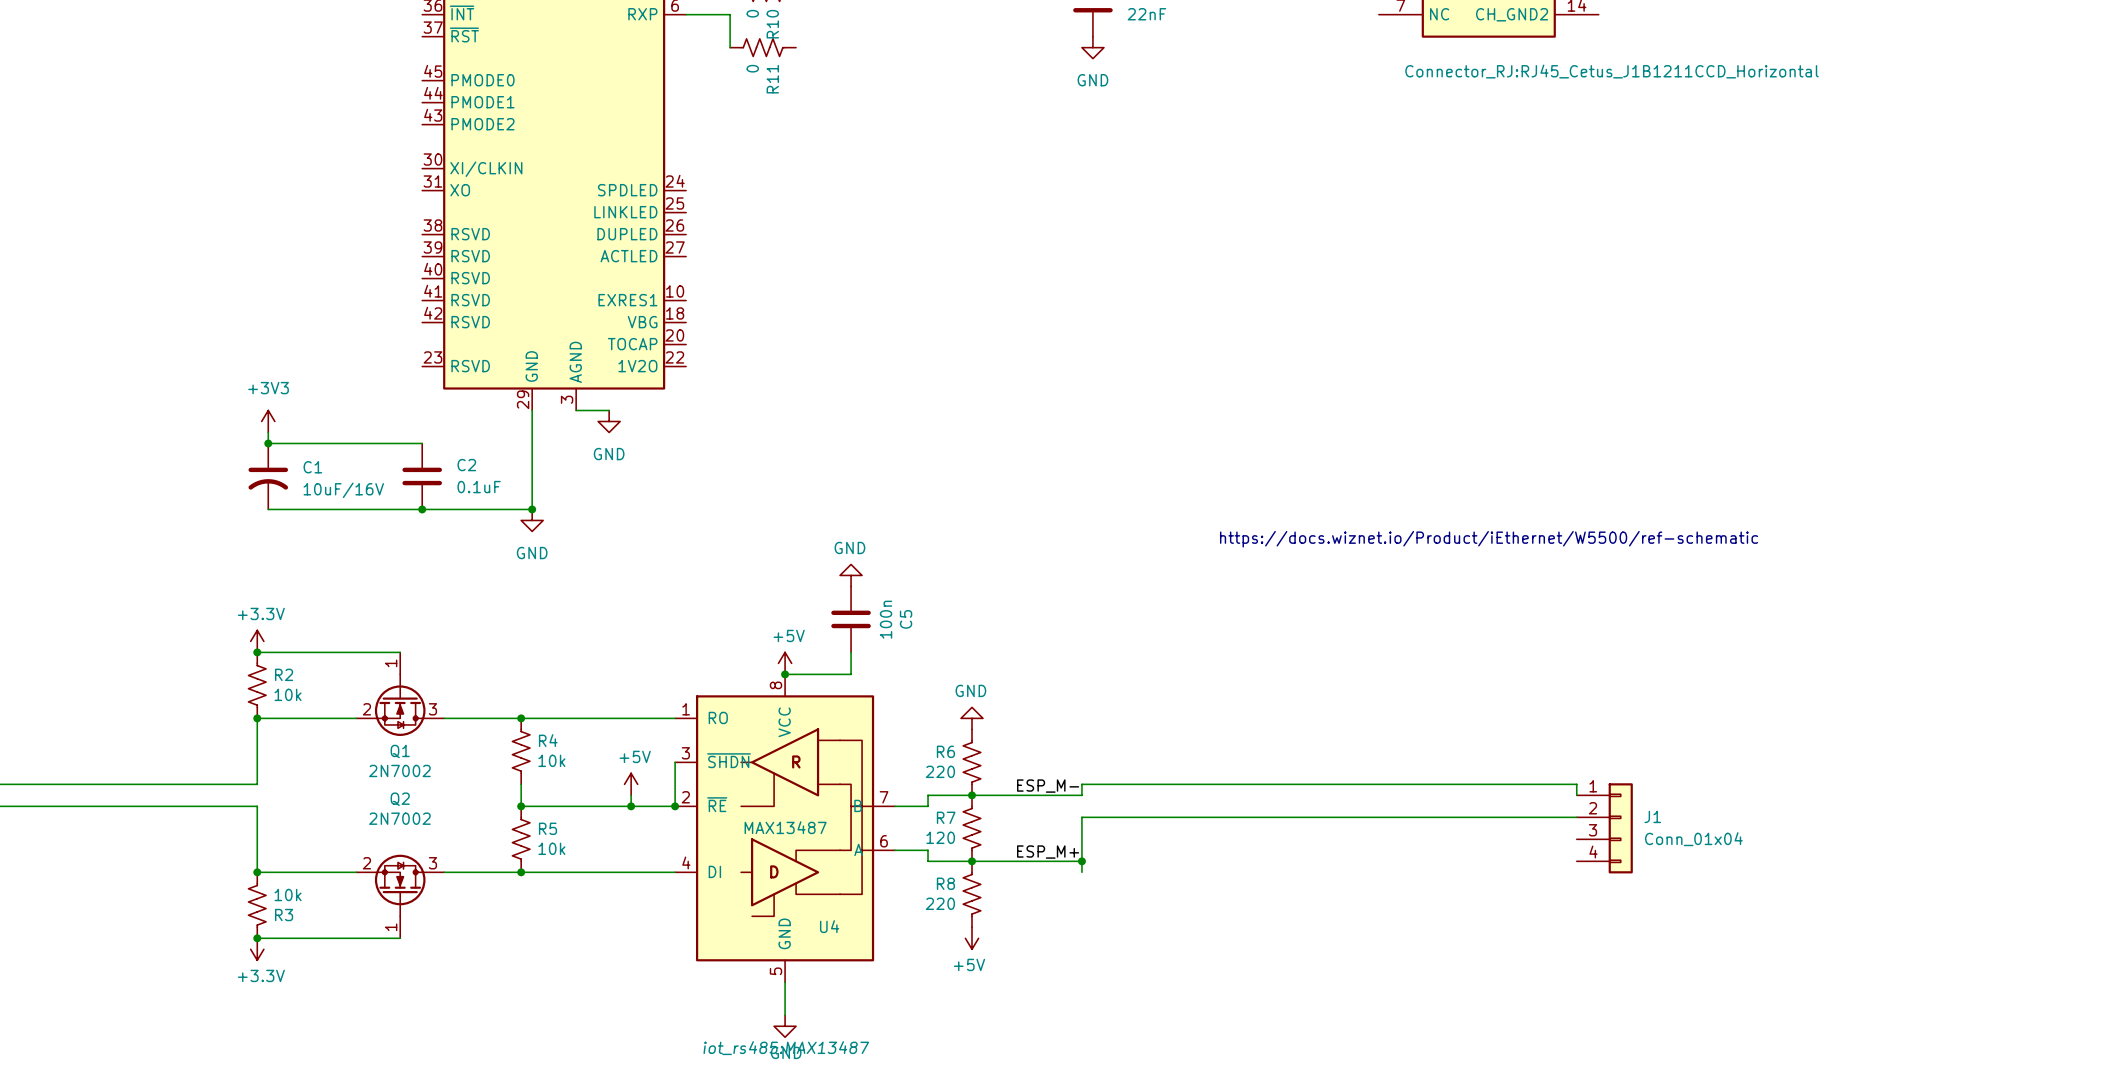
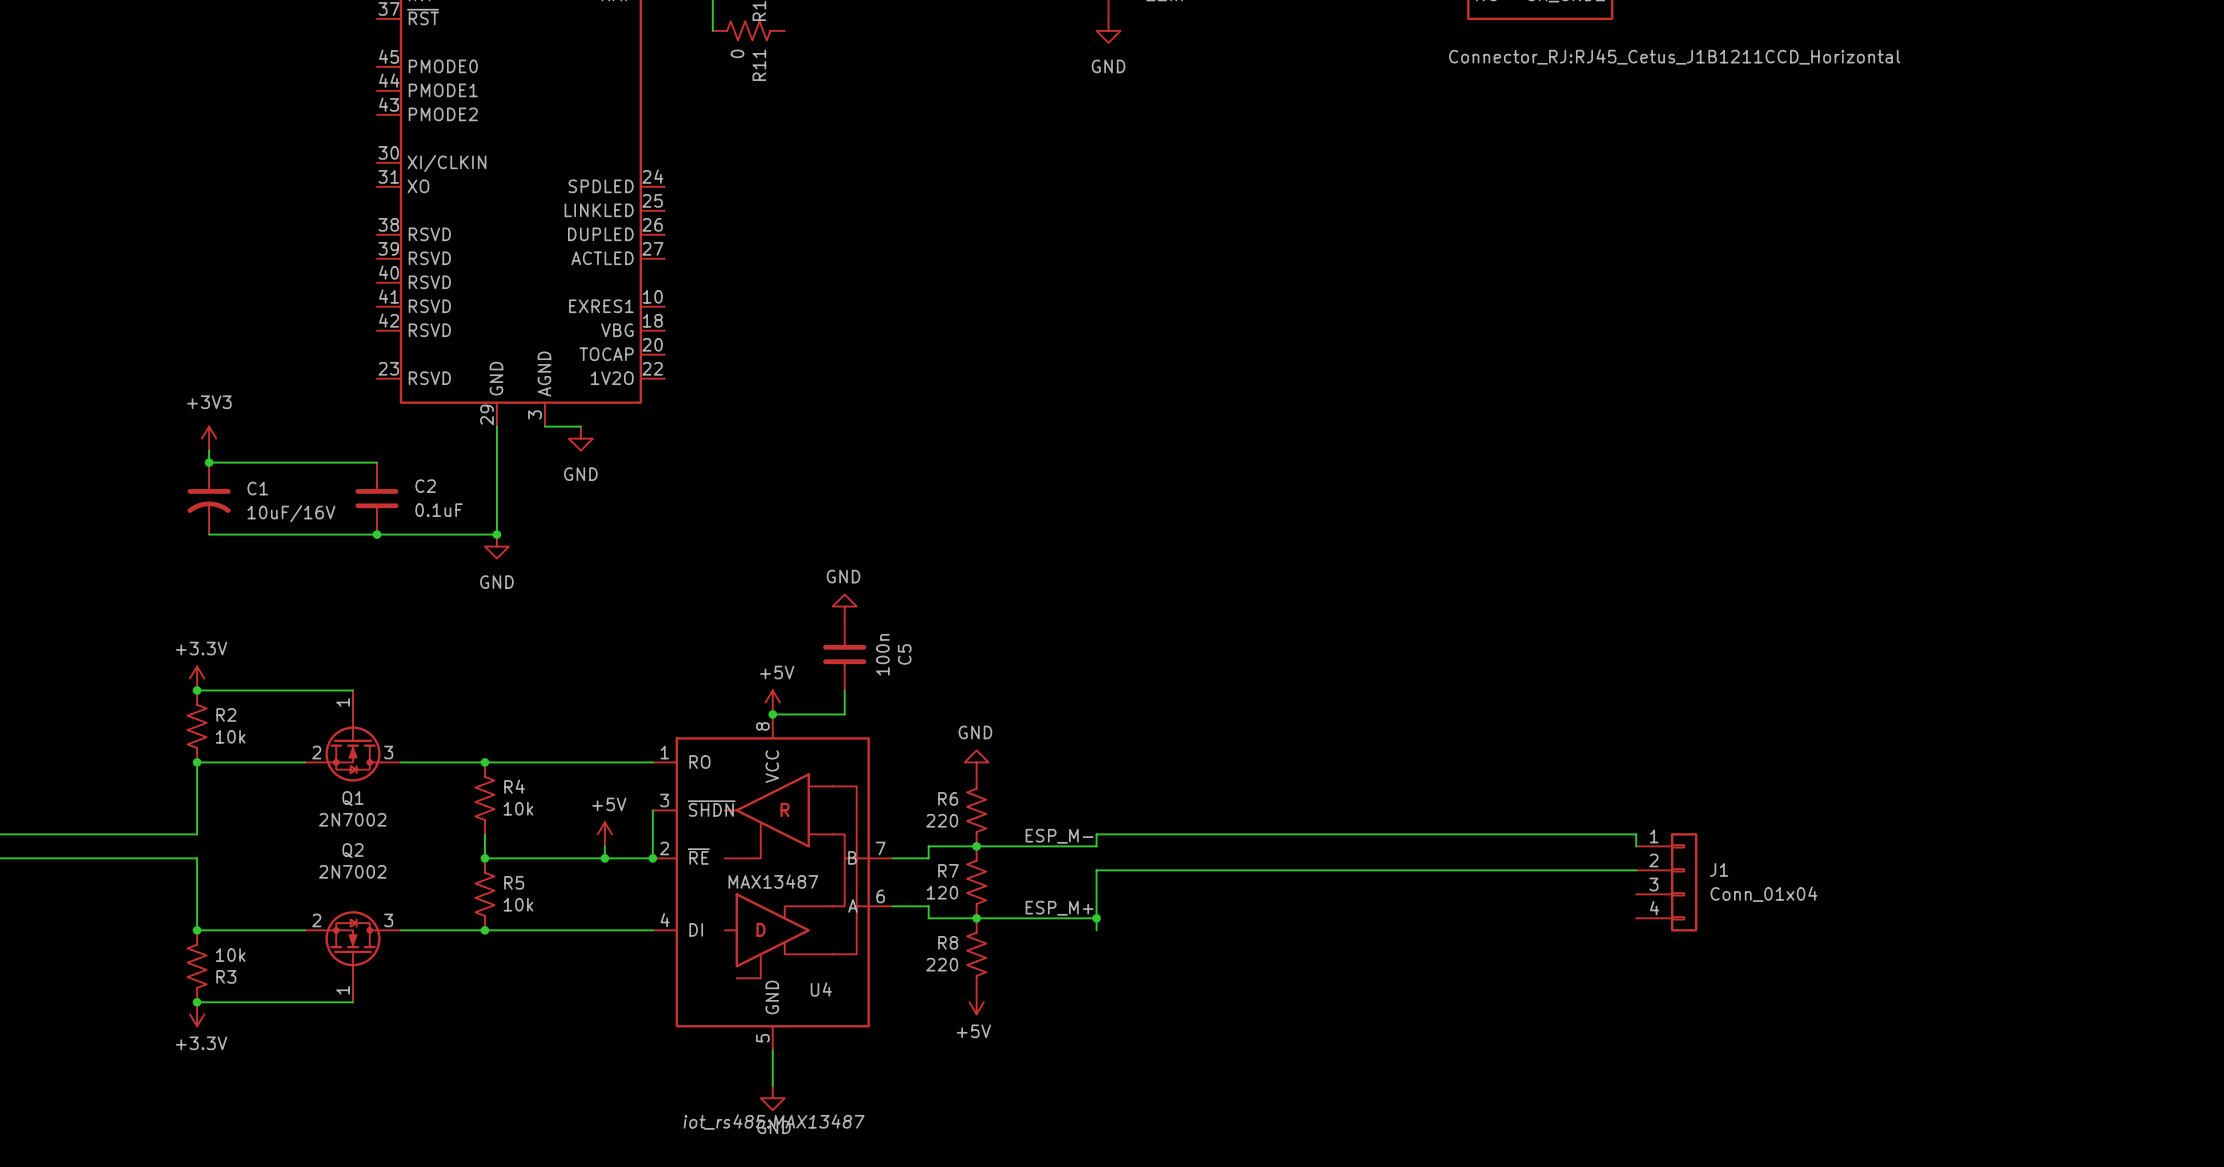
text: https://docs.wiznet.io/Product/iEthernet/W5500/ref-schematic (1489, 539) -> none

